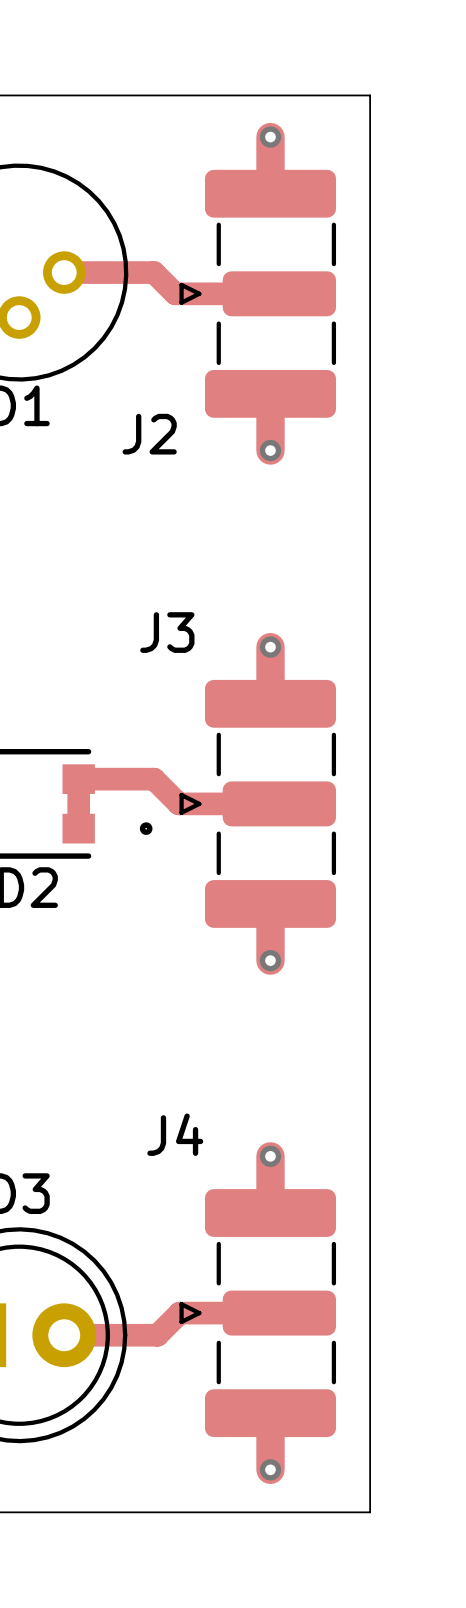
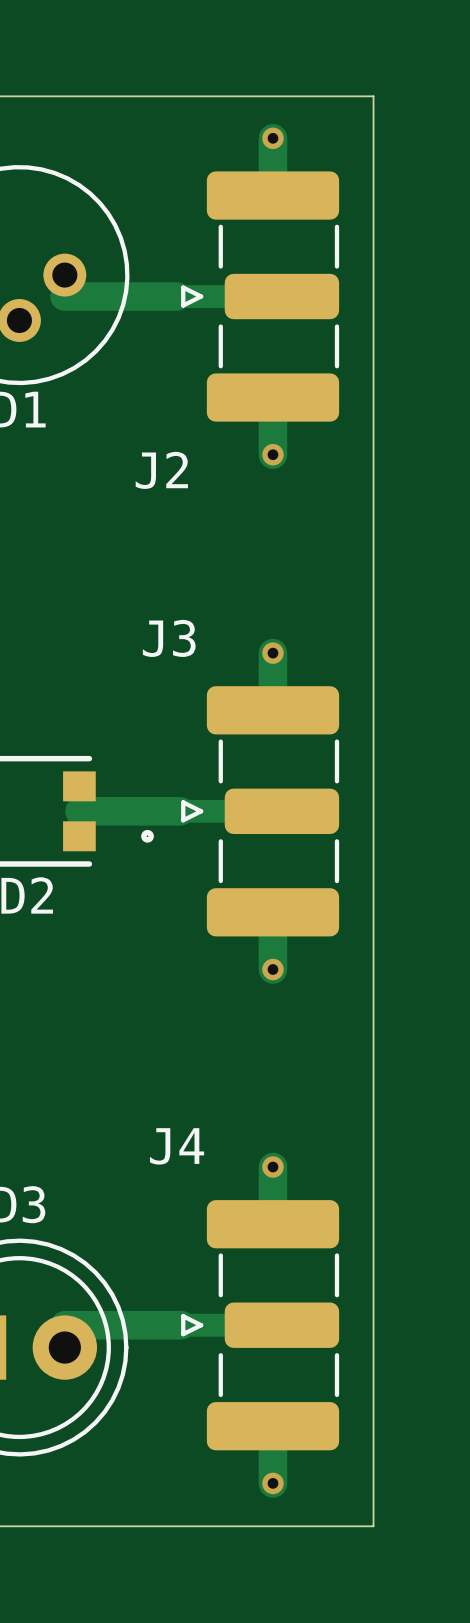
track: (64, 272) (154, 272) (175, 293) -> (64, 296) (176, 296)
J2 name position: J2 (149, 434) -> J2 (161, 470)
track: (78, 803) (78, 779) (154, 779) (178, 803) -> (79, 811) (180, 811)
track: (179, 1313) (157, 1335) (64, 1335) -> (181, 1325) (64, 1325)

